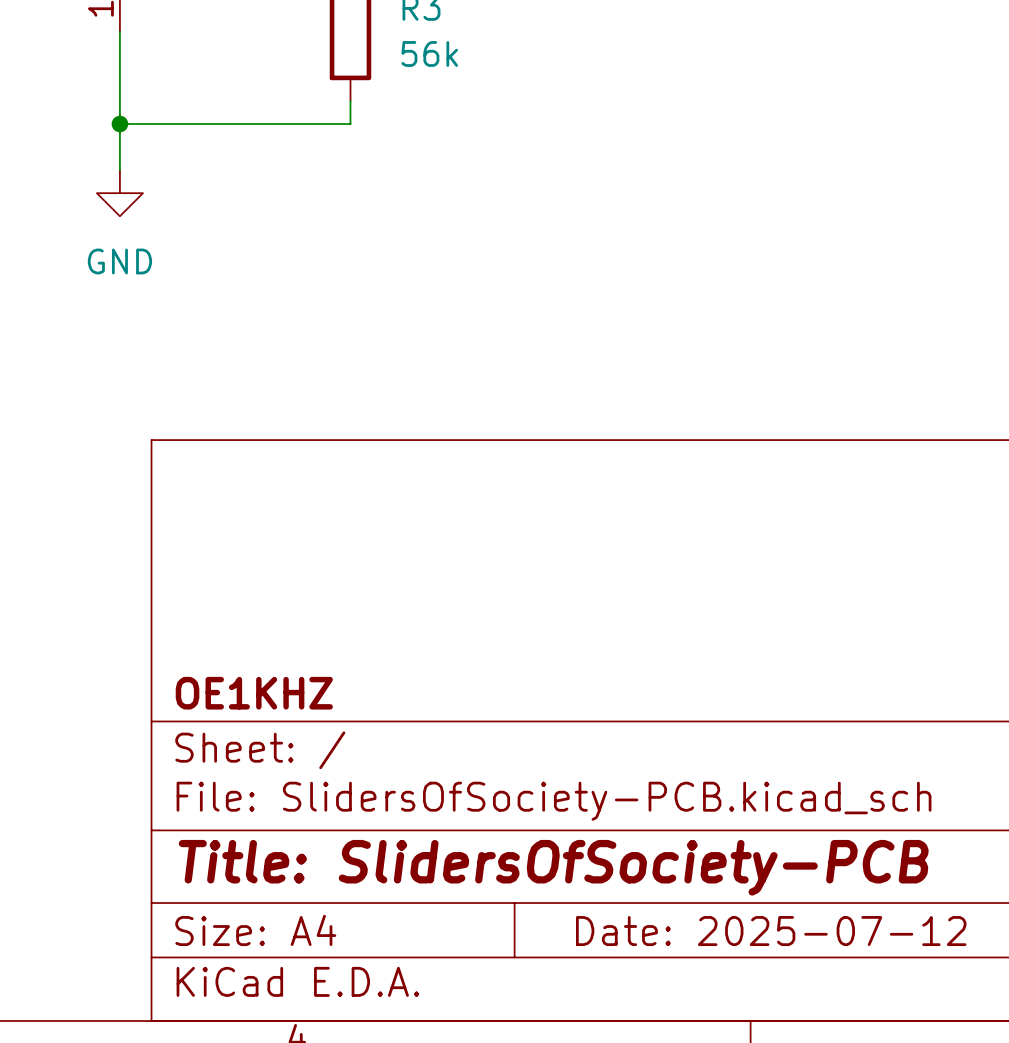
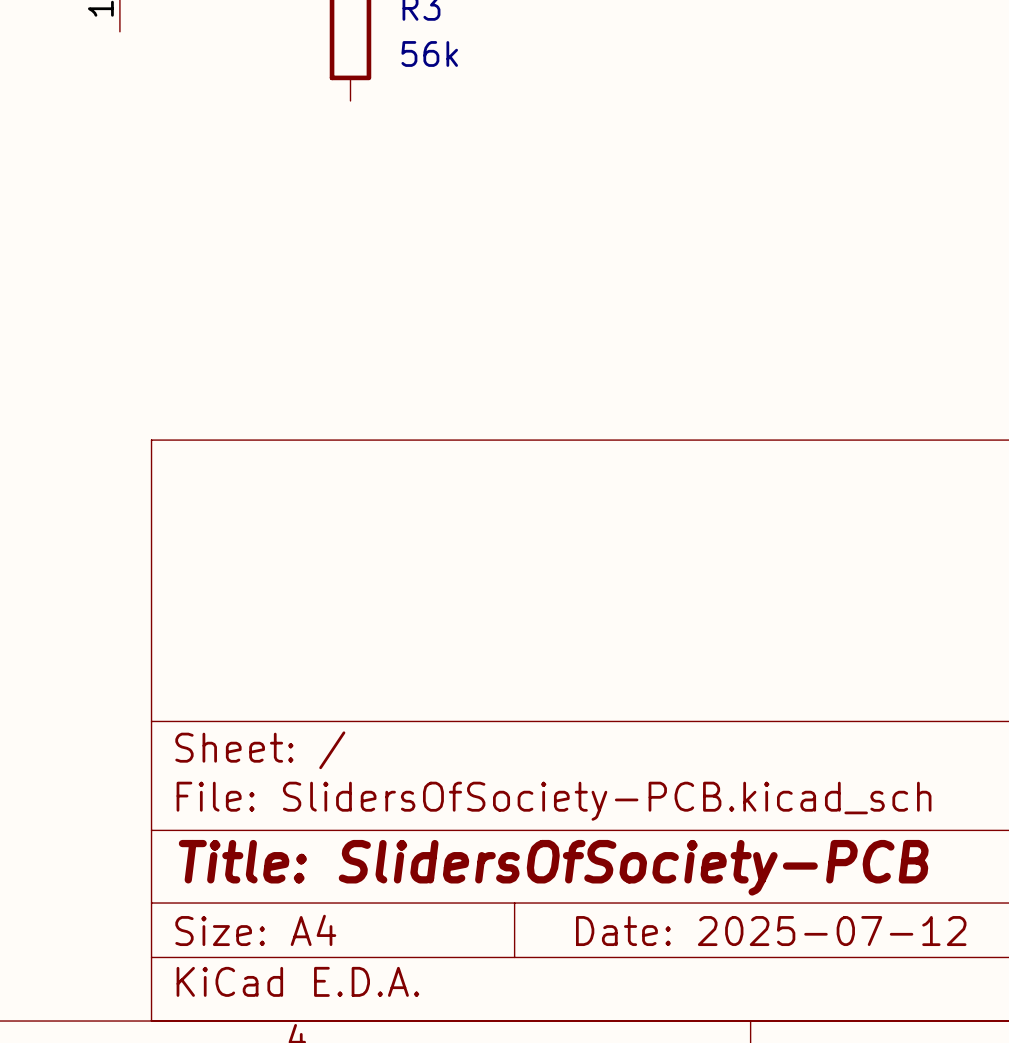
wire: (119, 31) (119, 170) -> none
wire: (350, 100) (350, 124) (119, 124) -> none
junction: (119, 124) -> none
power symbol: GND (119, 193) -> none
title block: OE1KHZ (254, 693) -> none

